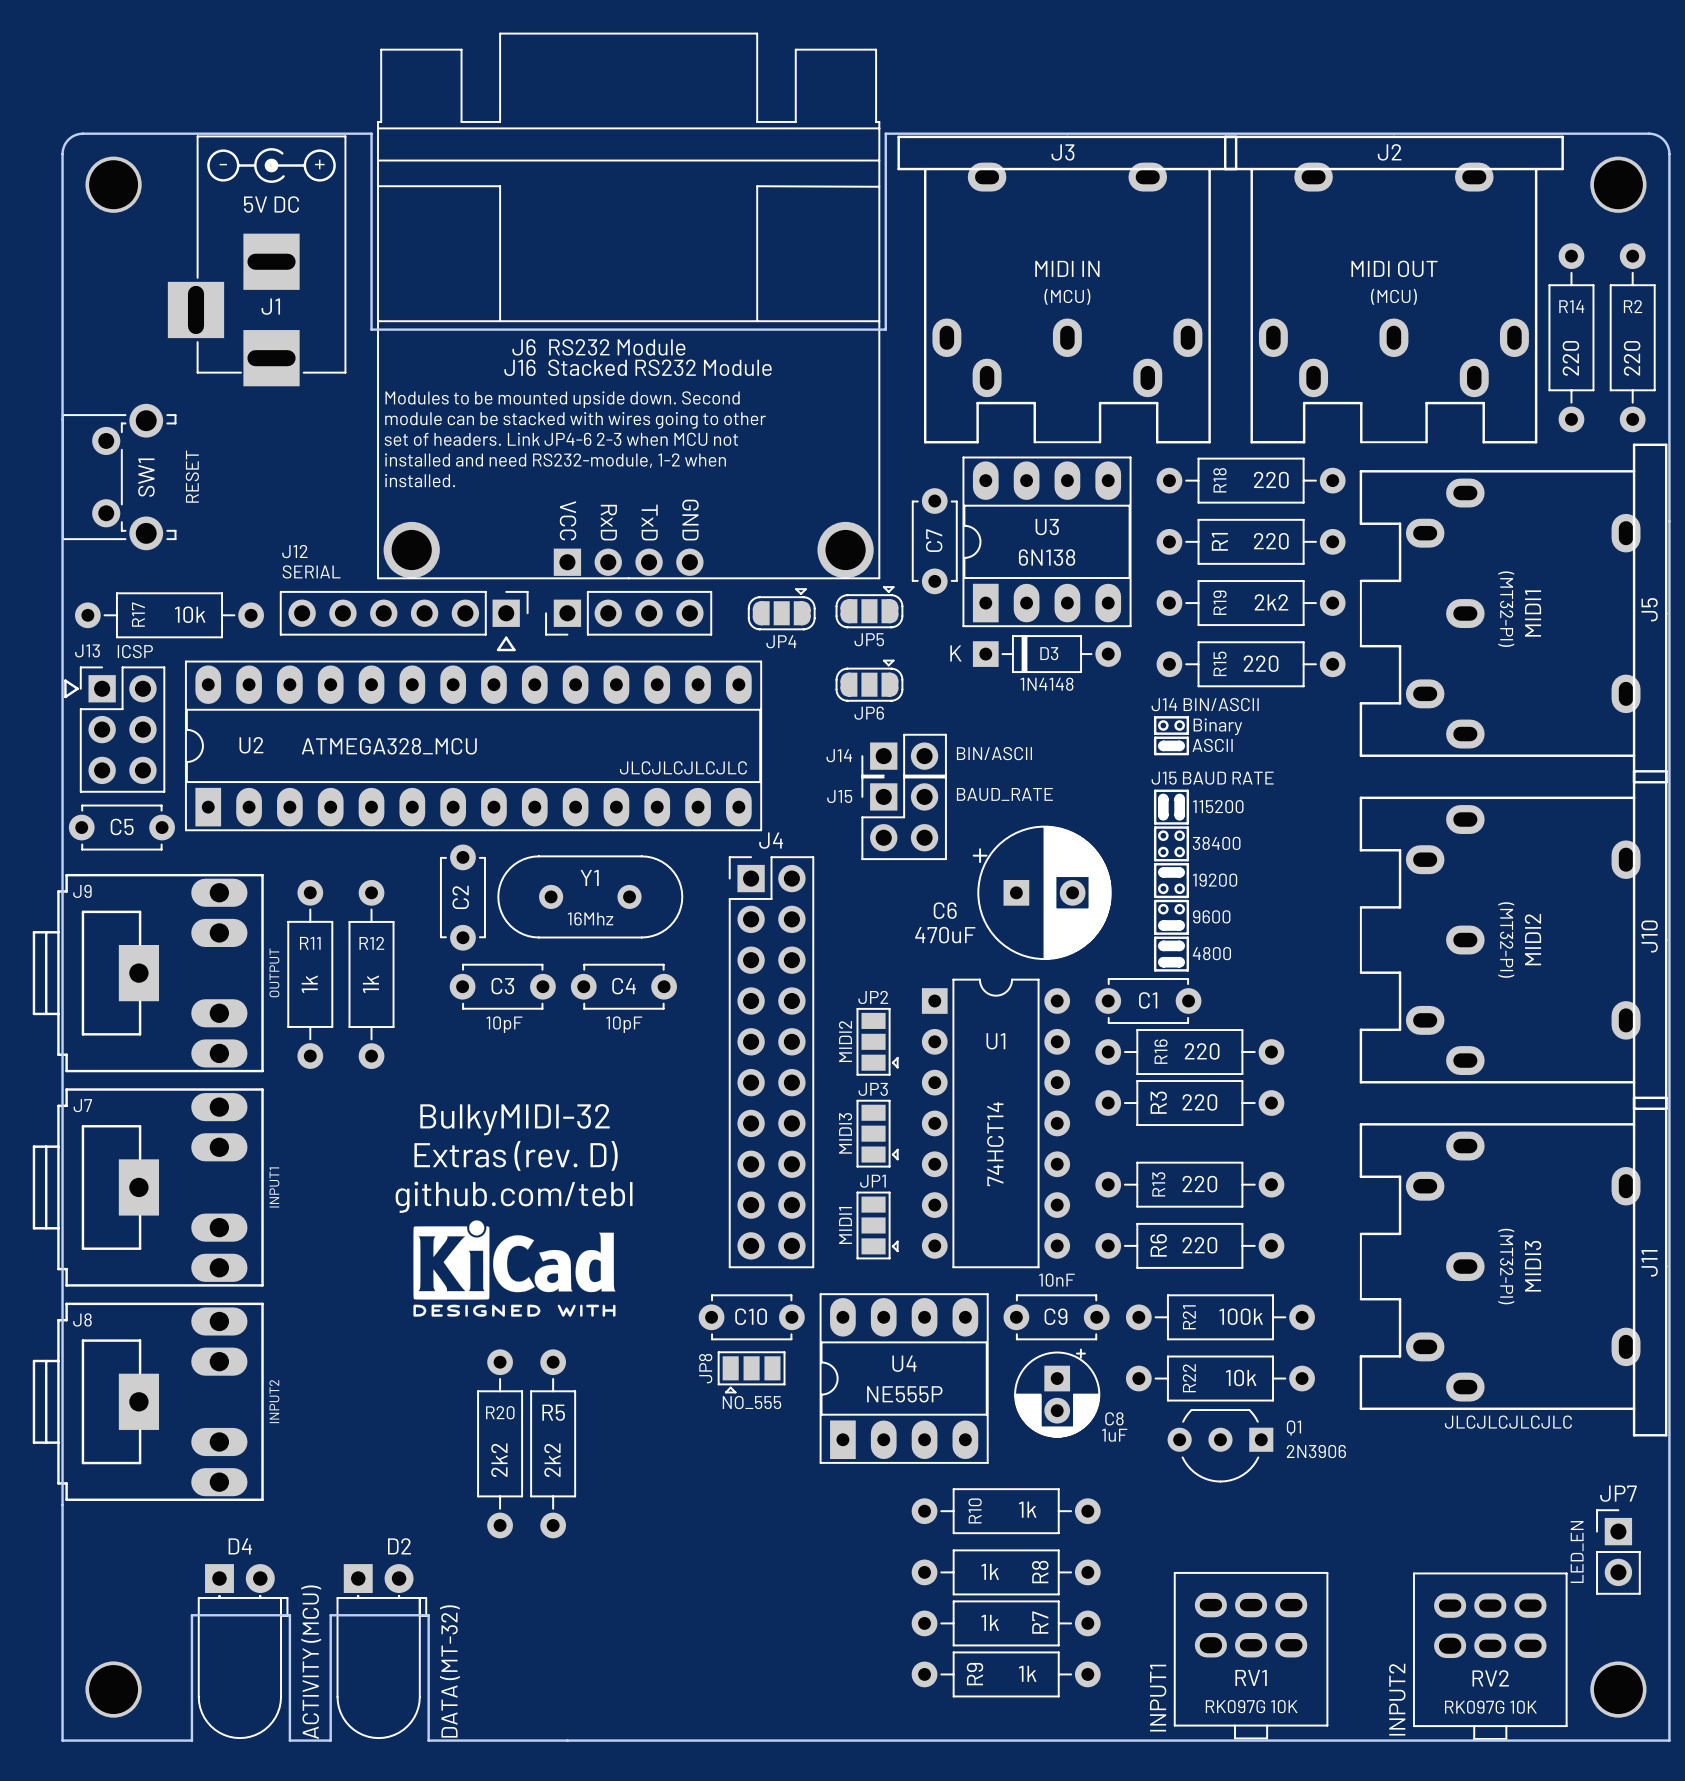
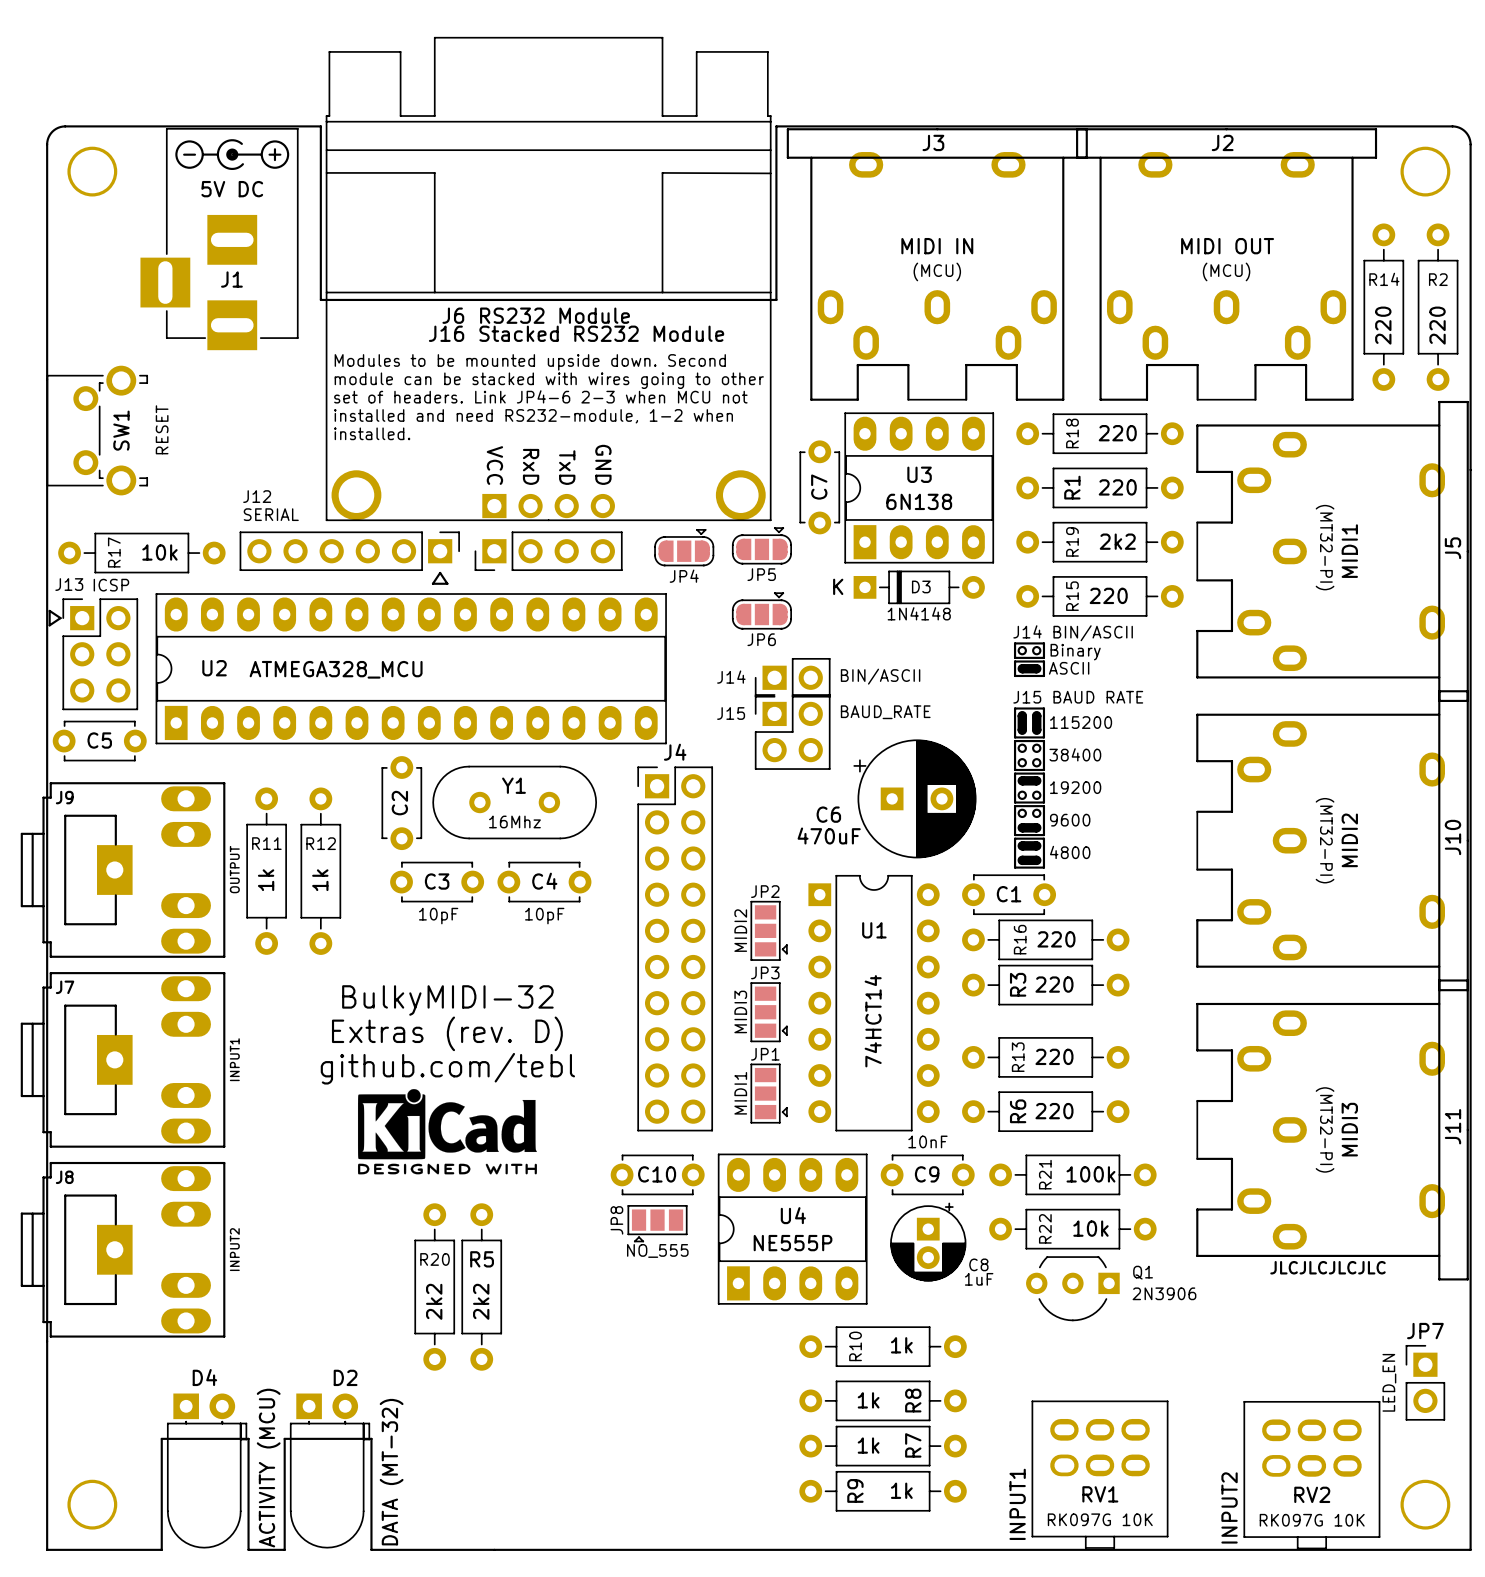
text: JLCJLCJLCJLC (683, 767) -> none

